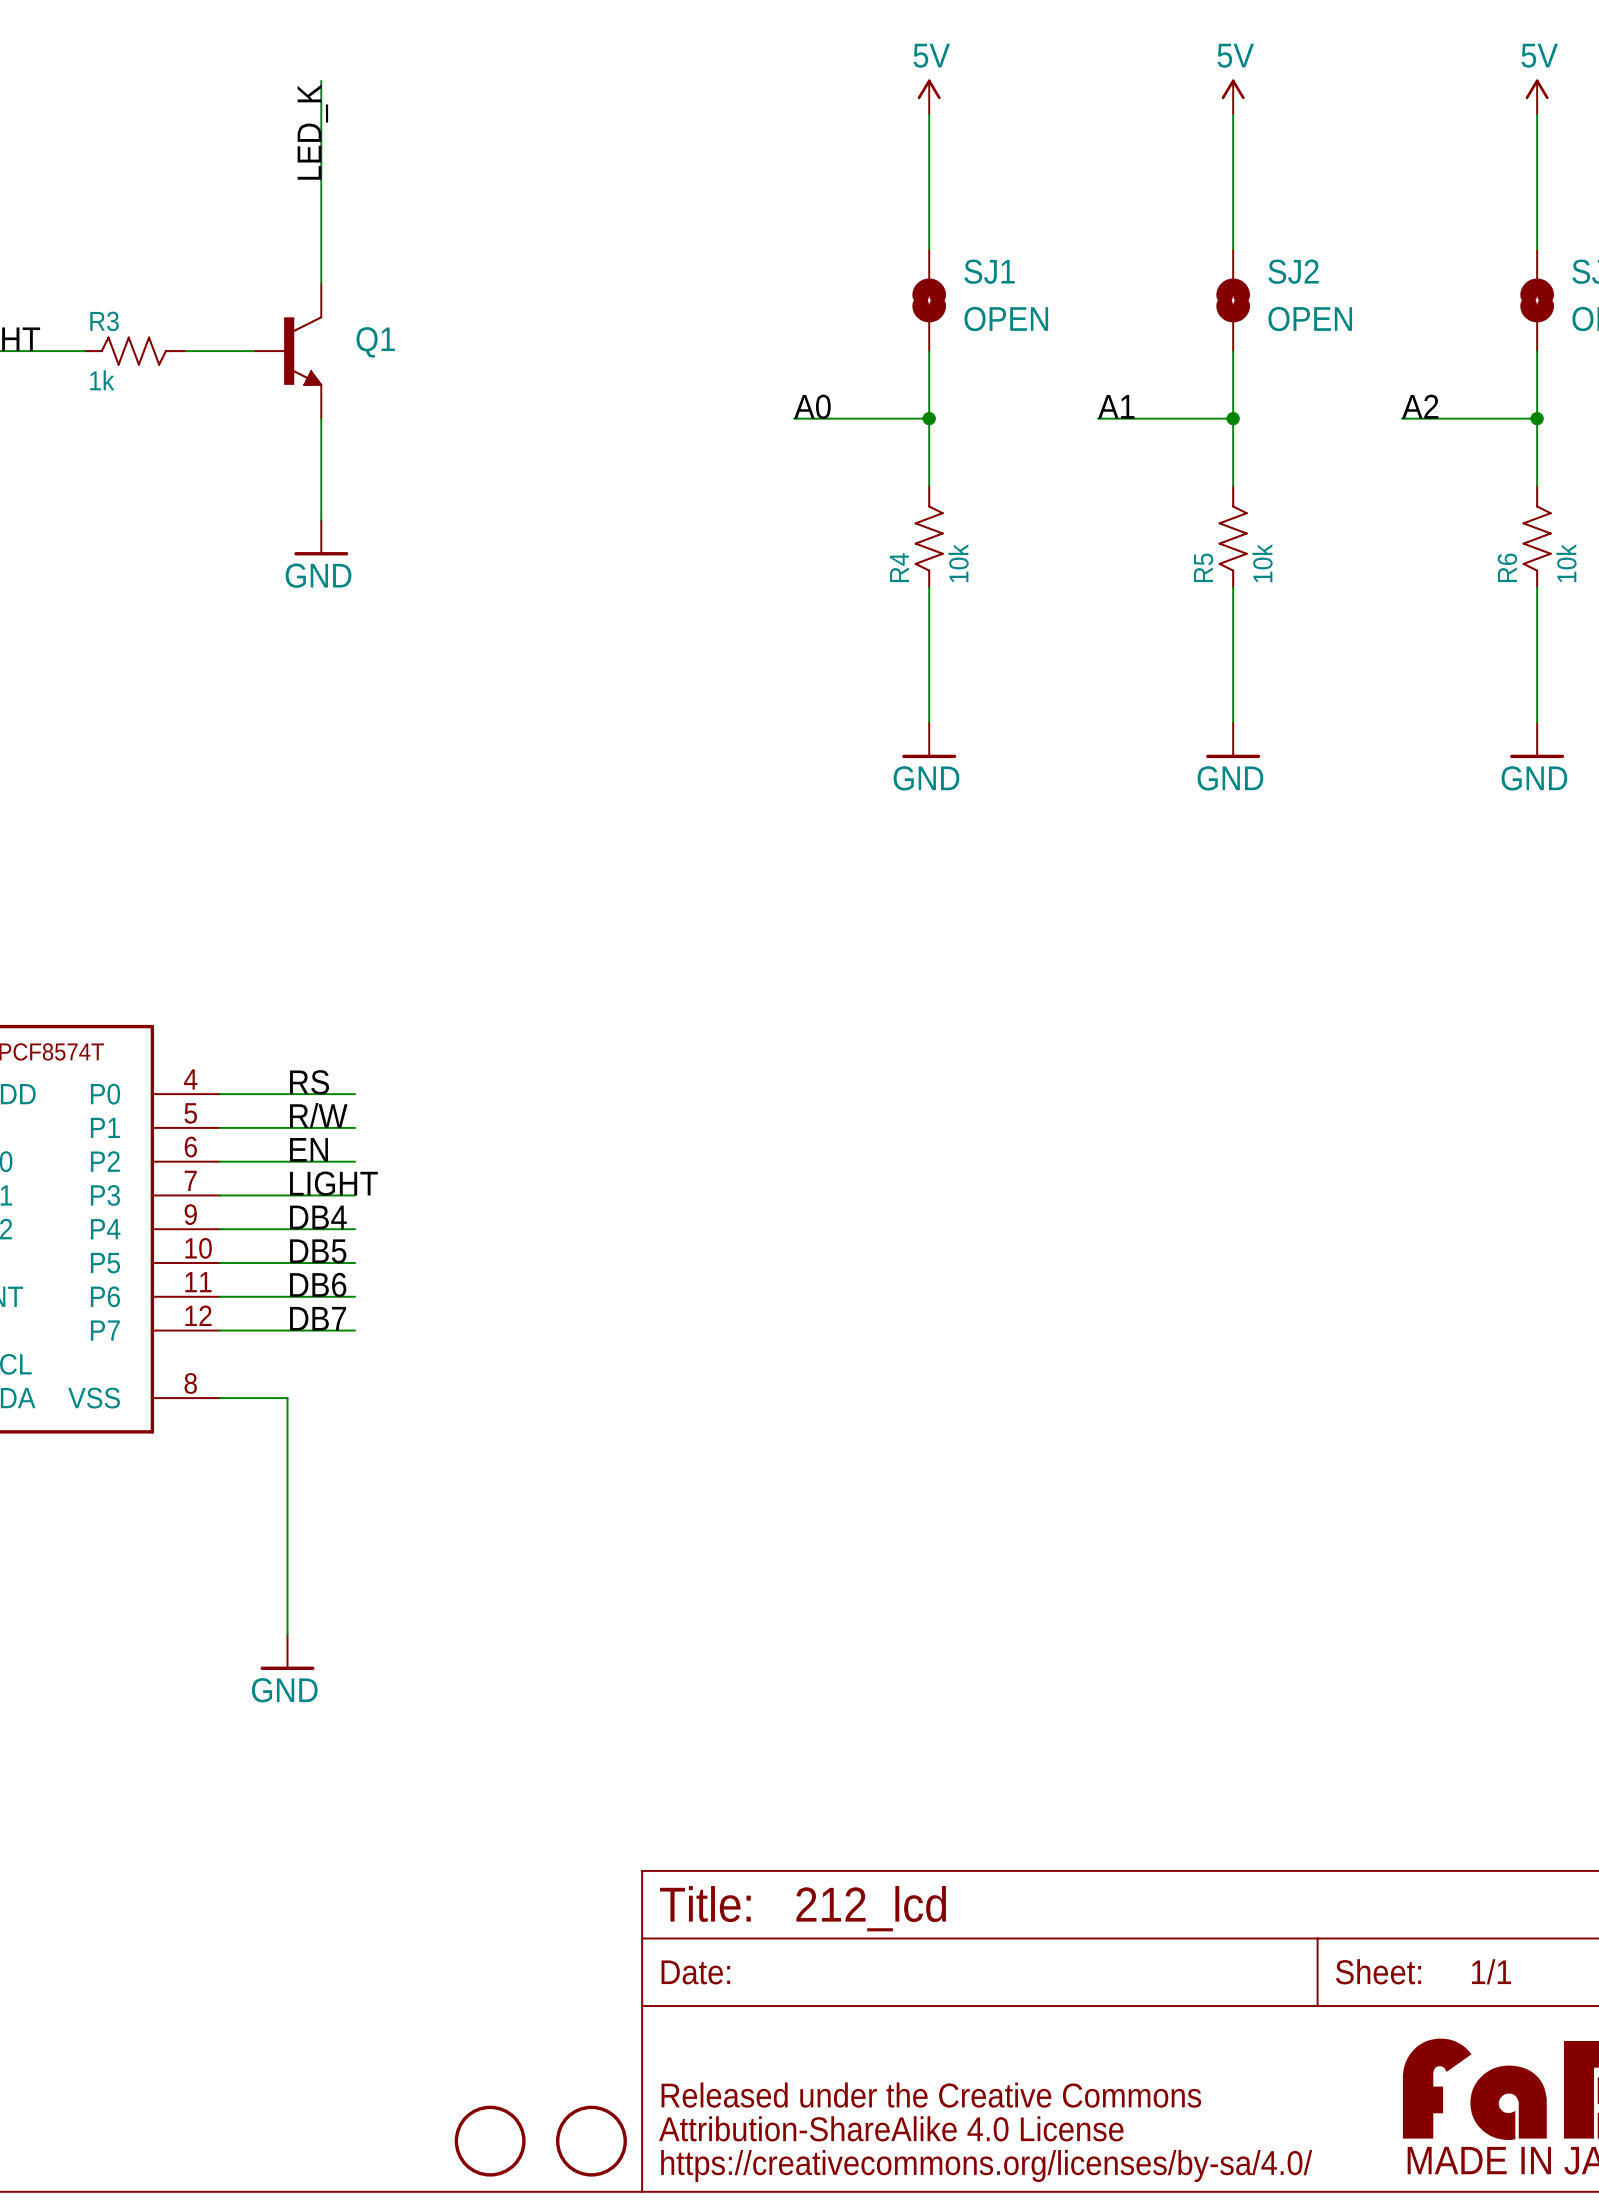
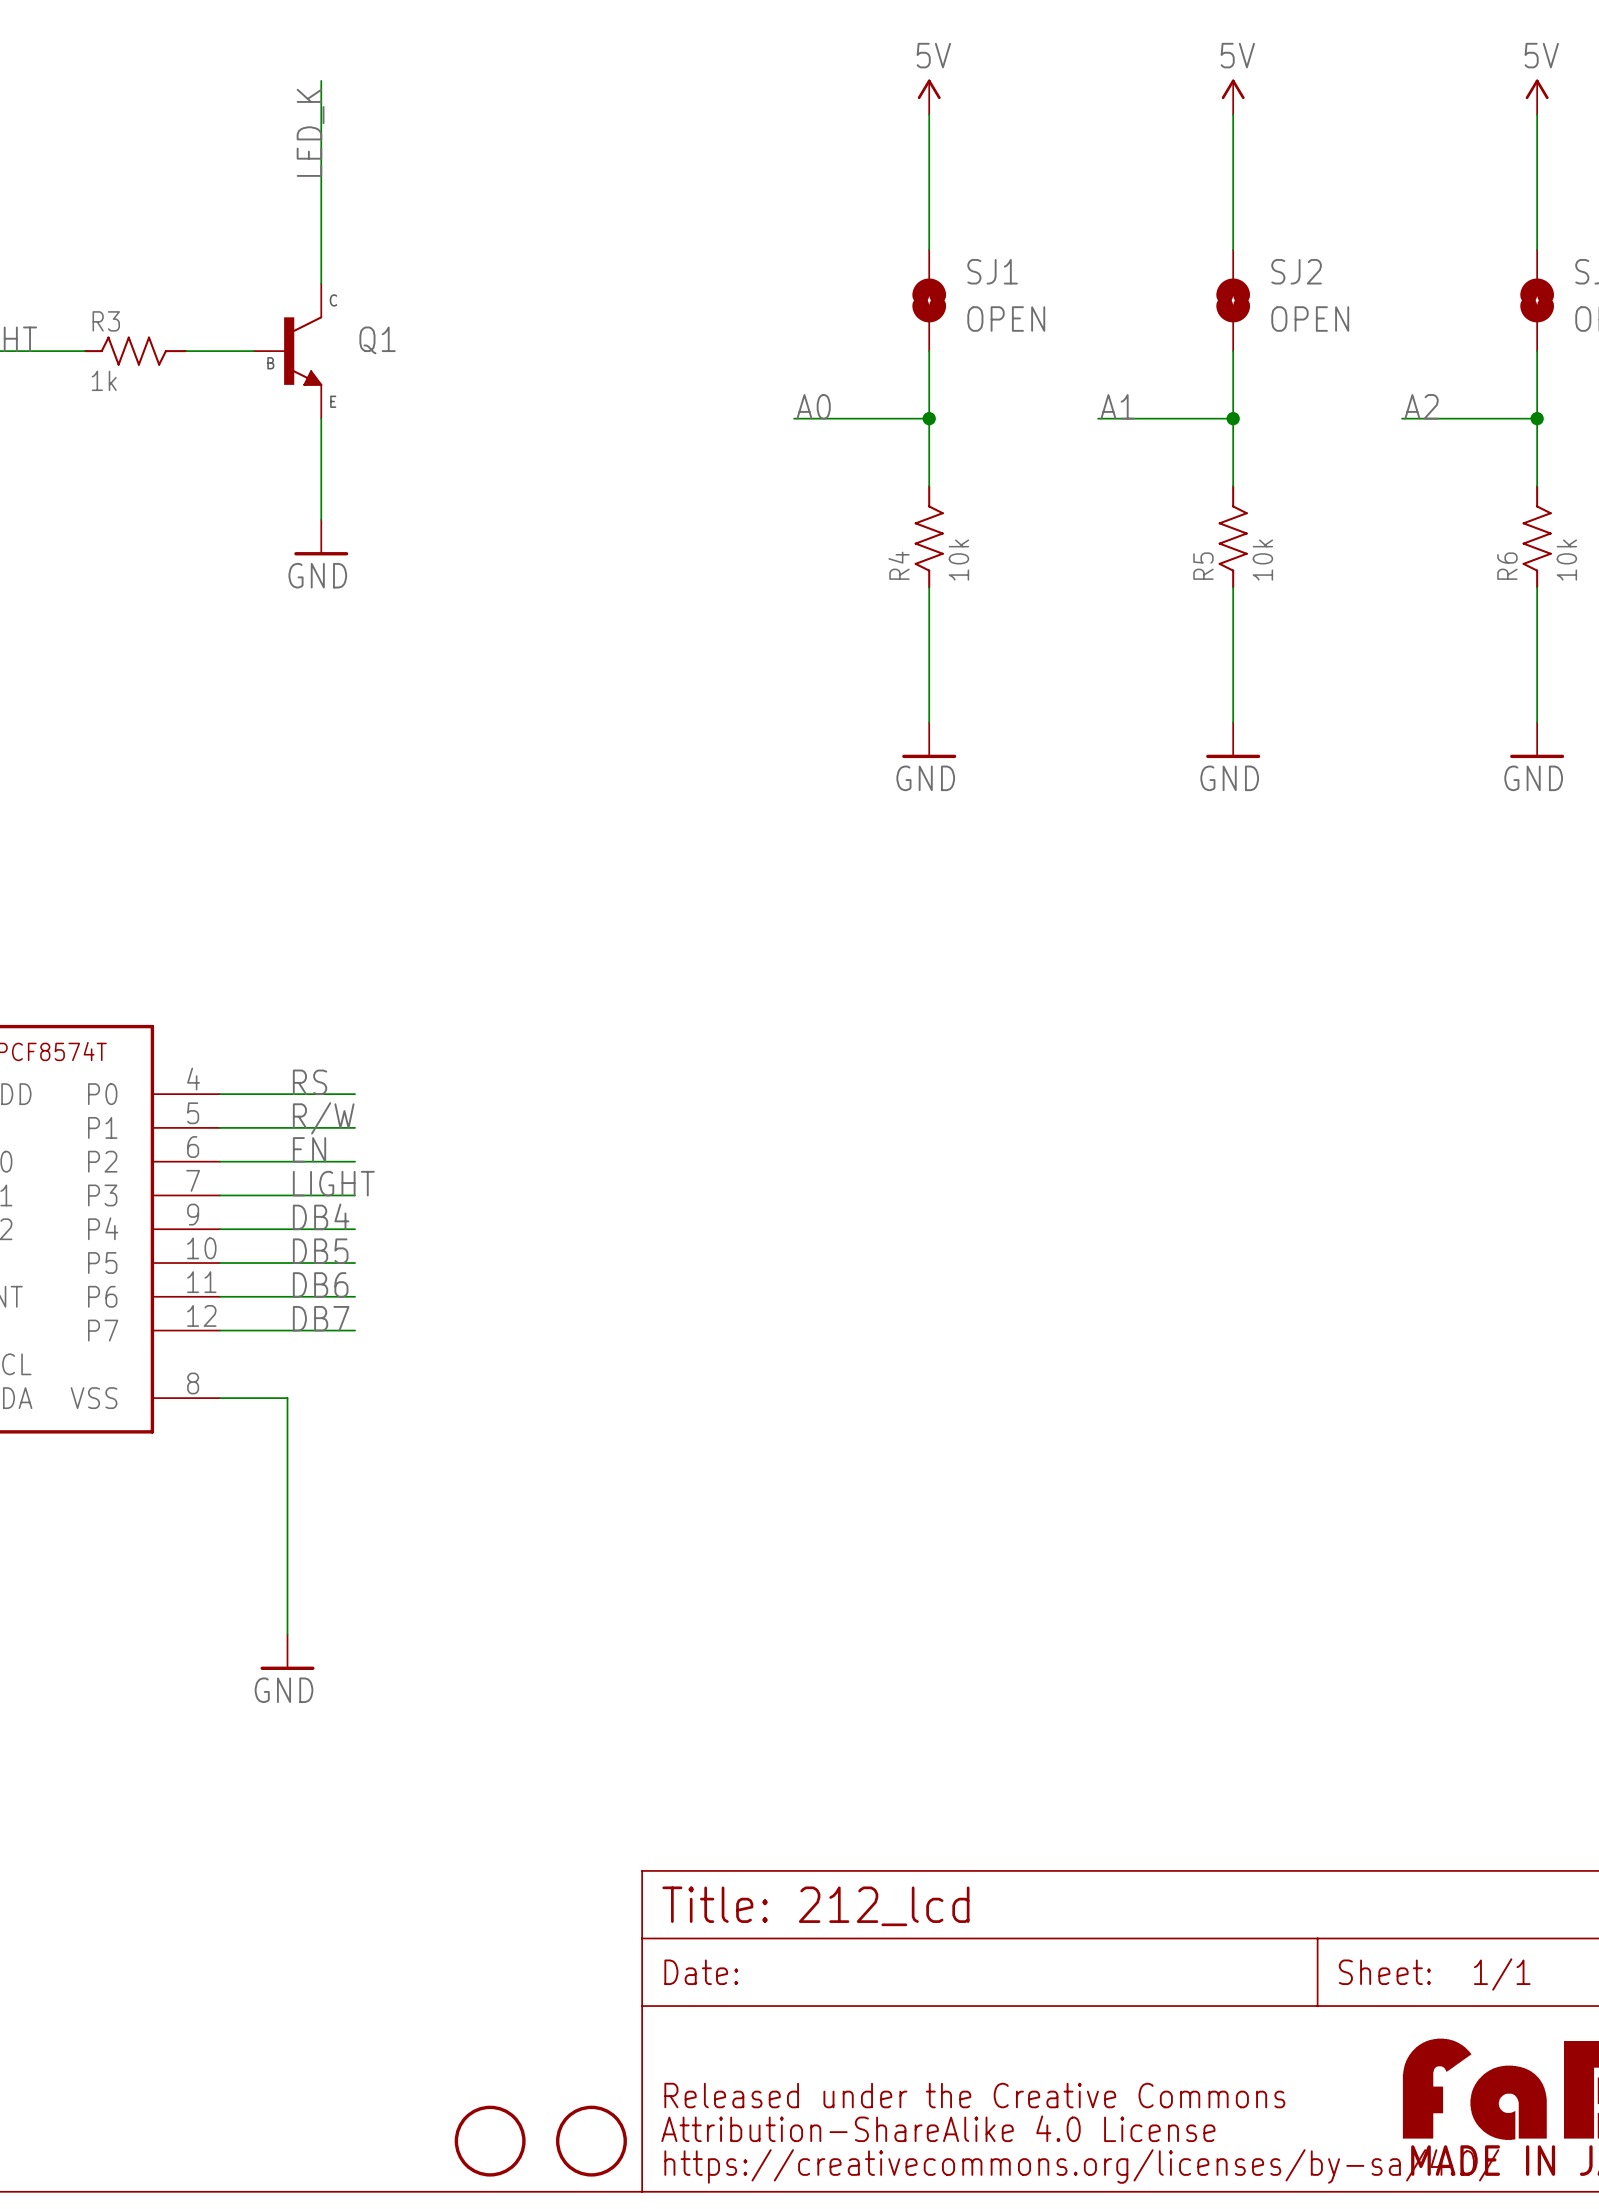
Q1 text: none -> C (333, 300)
Q1 text: none -> B (270, 363)
Q1 text: none -> E (333, 401)

